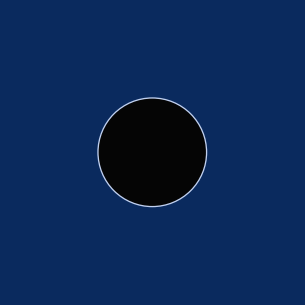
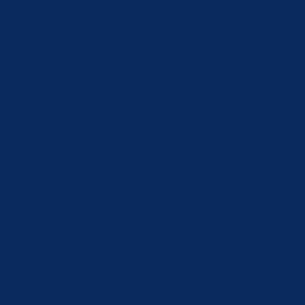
part: (152, 152) -> none

